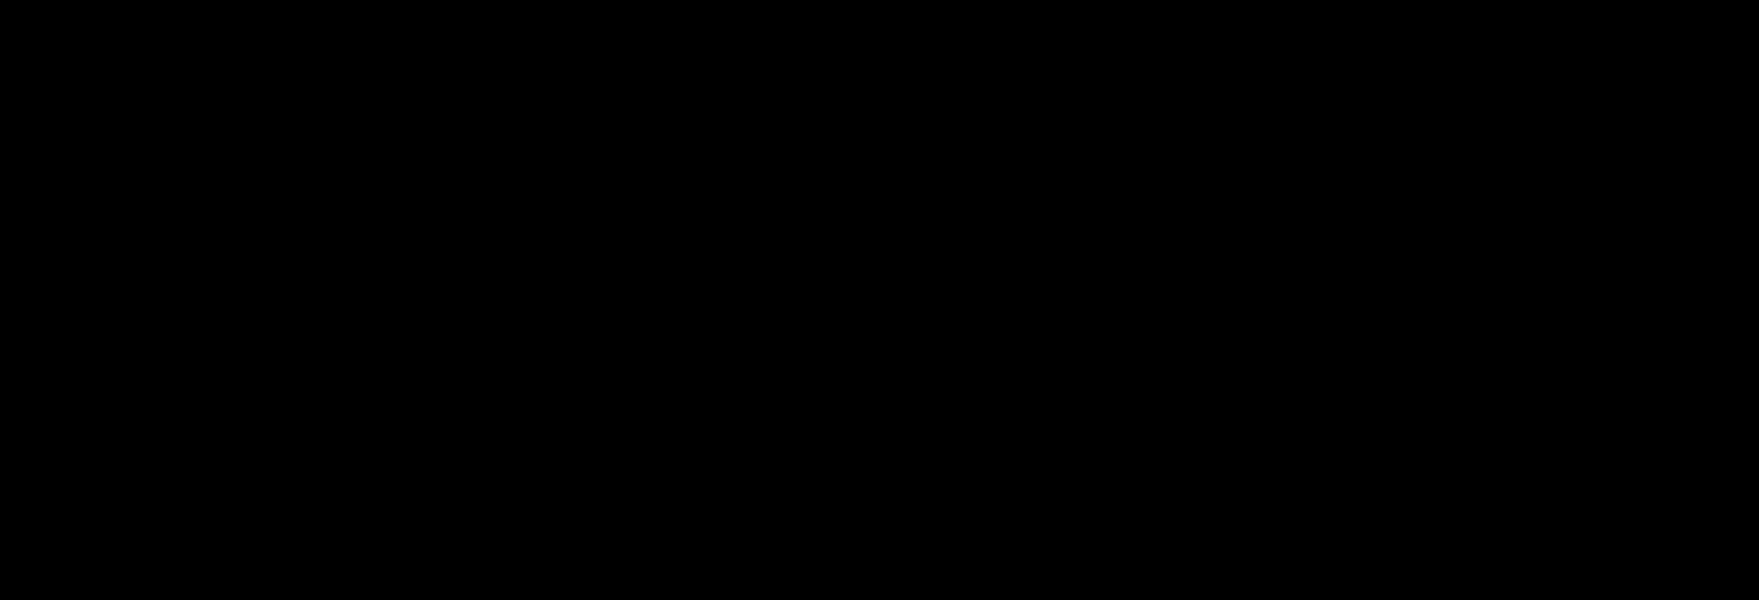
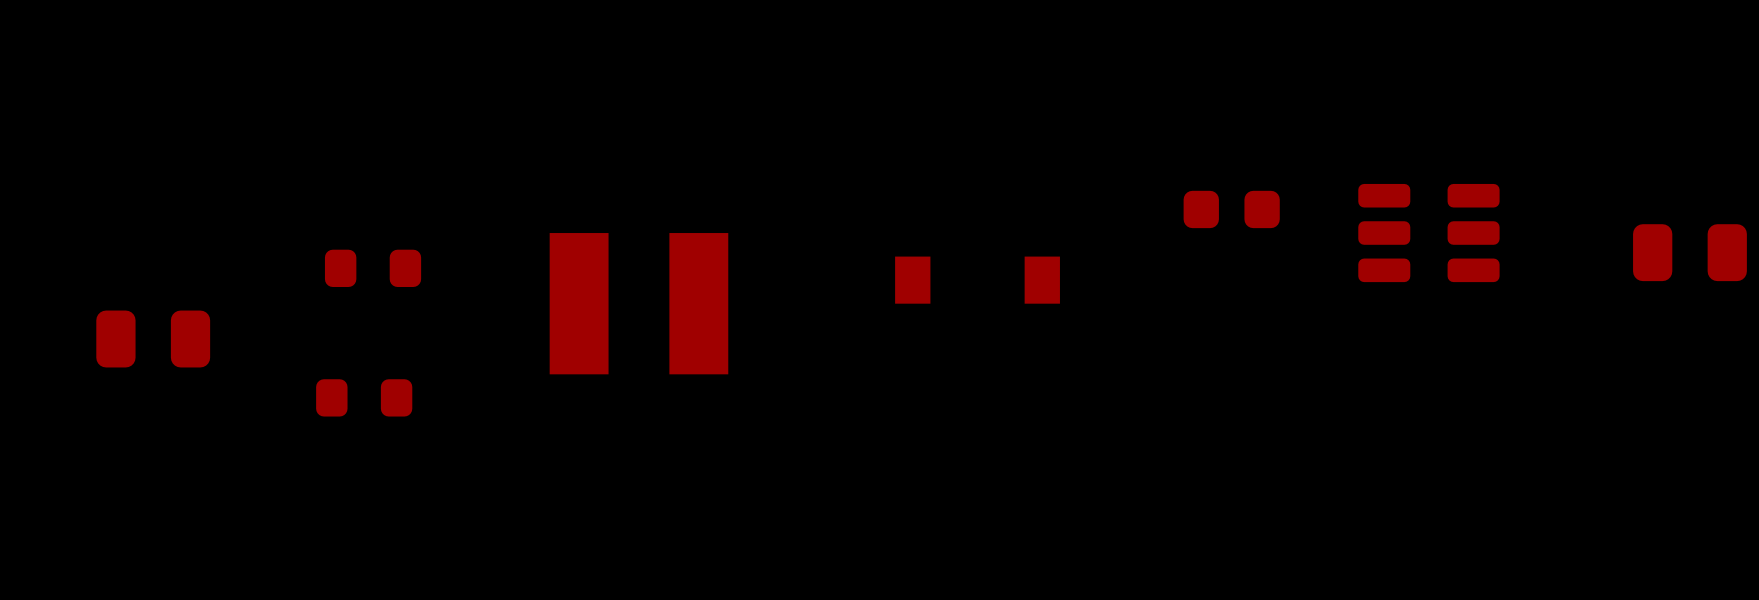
part: none -> (1231, 209)
part: none -> (1428, 233)
part: none -> (1689, 252)
part: none -> (373, 268)
part: none -> (977, 280)
part: none -> (638, 303)
part: none -> (153, 339)
part: none -> (364, 397)

